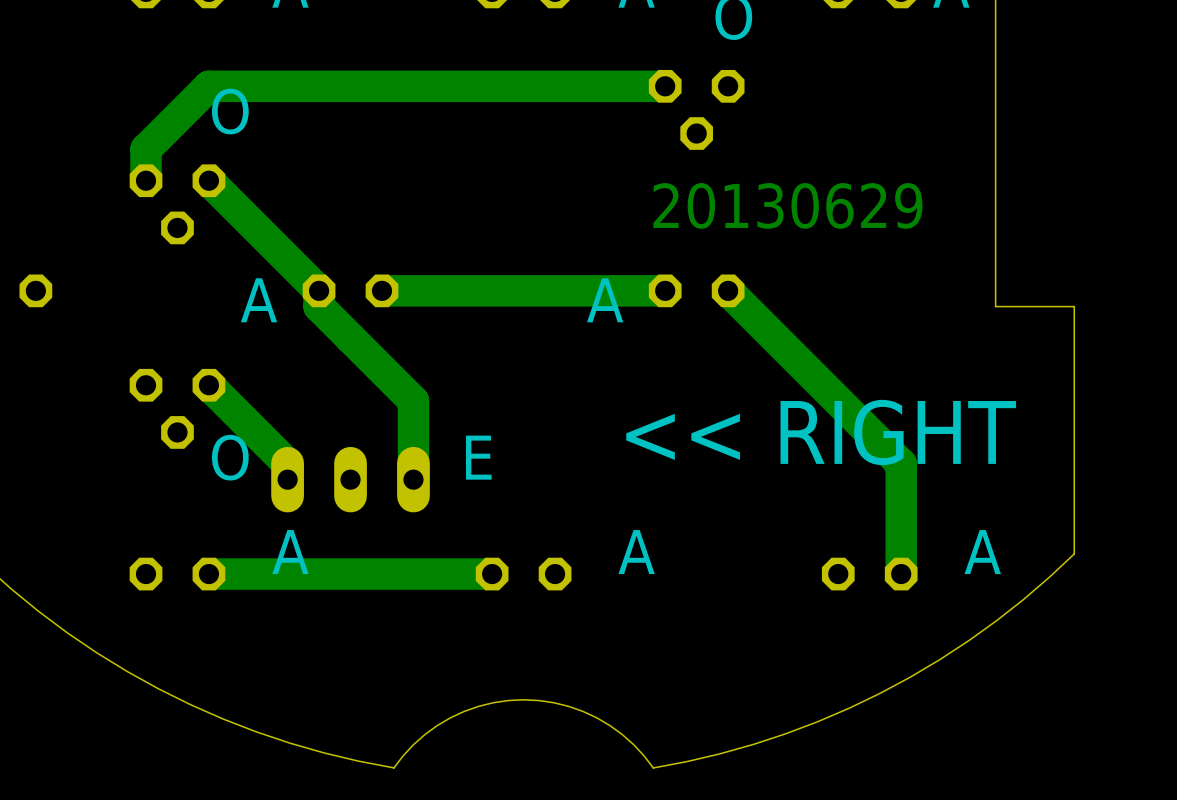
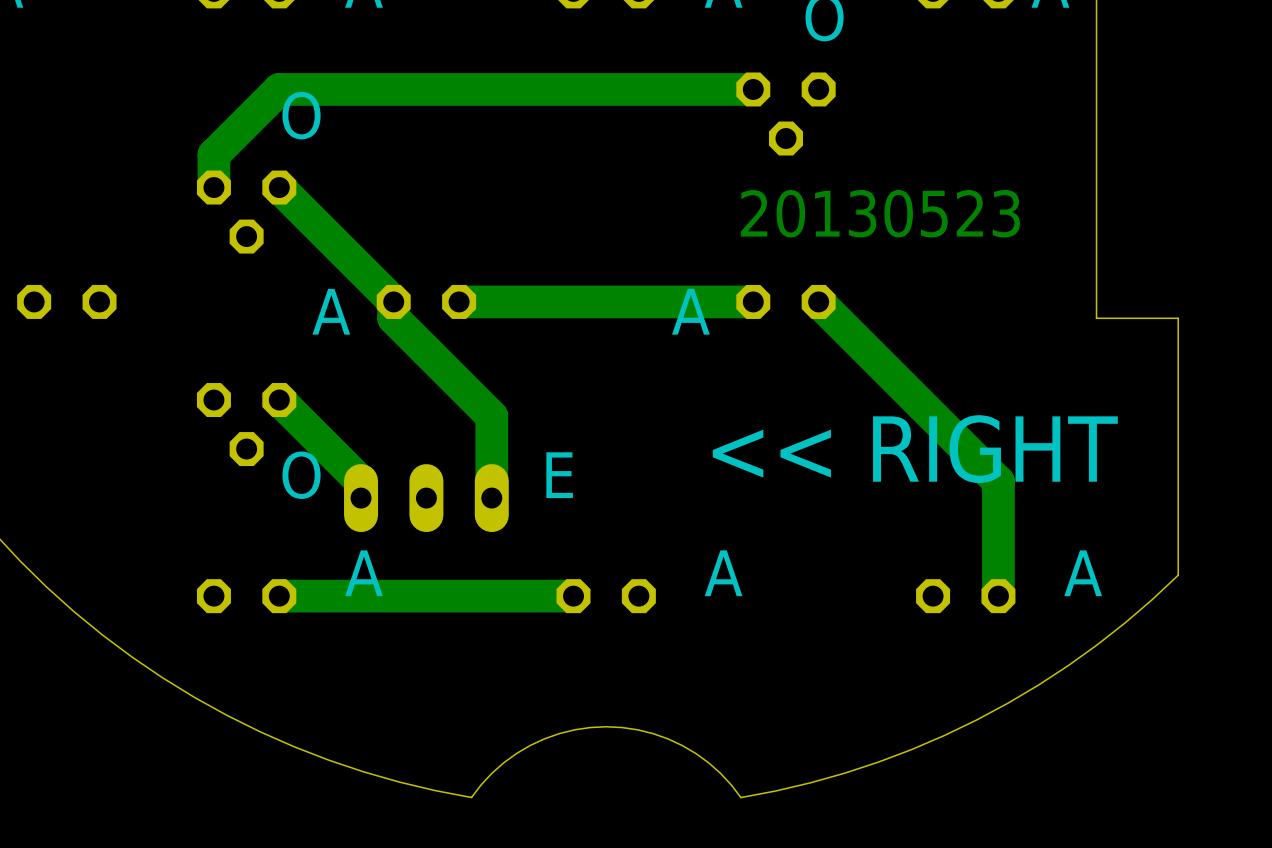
text: 20130629 (787, 205) -> 20130523 (880, 213)

